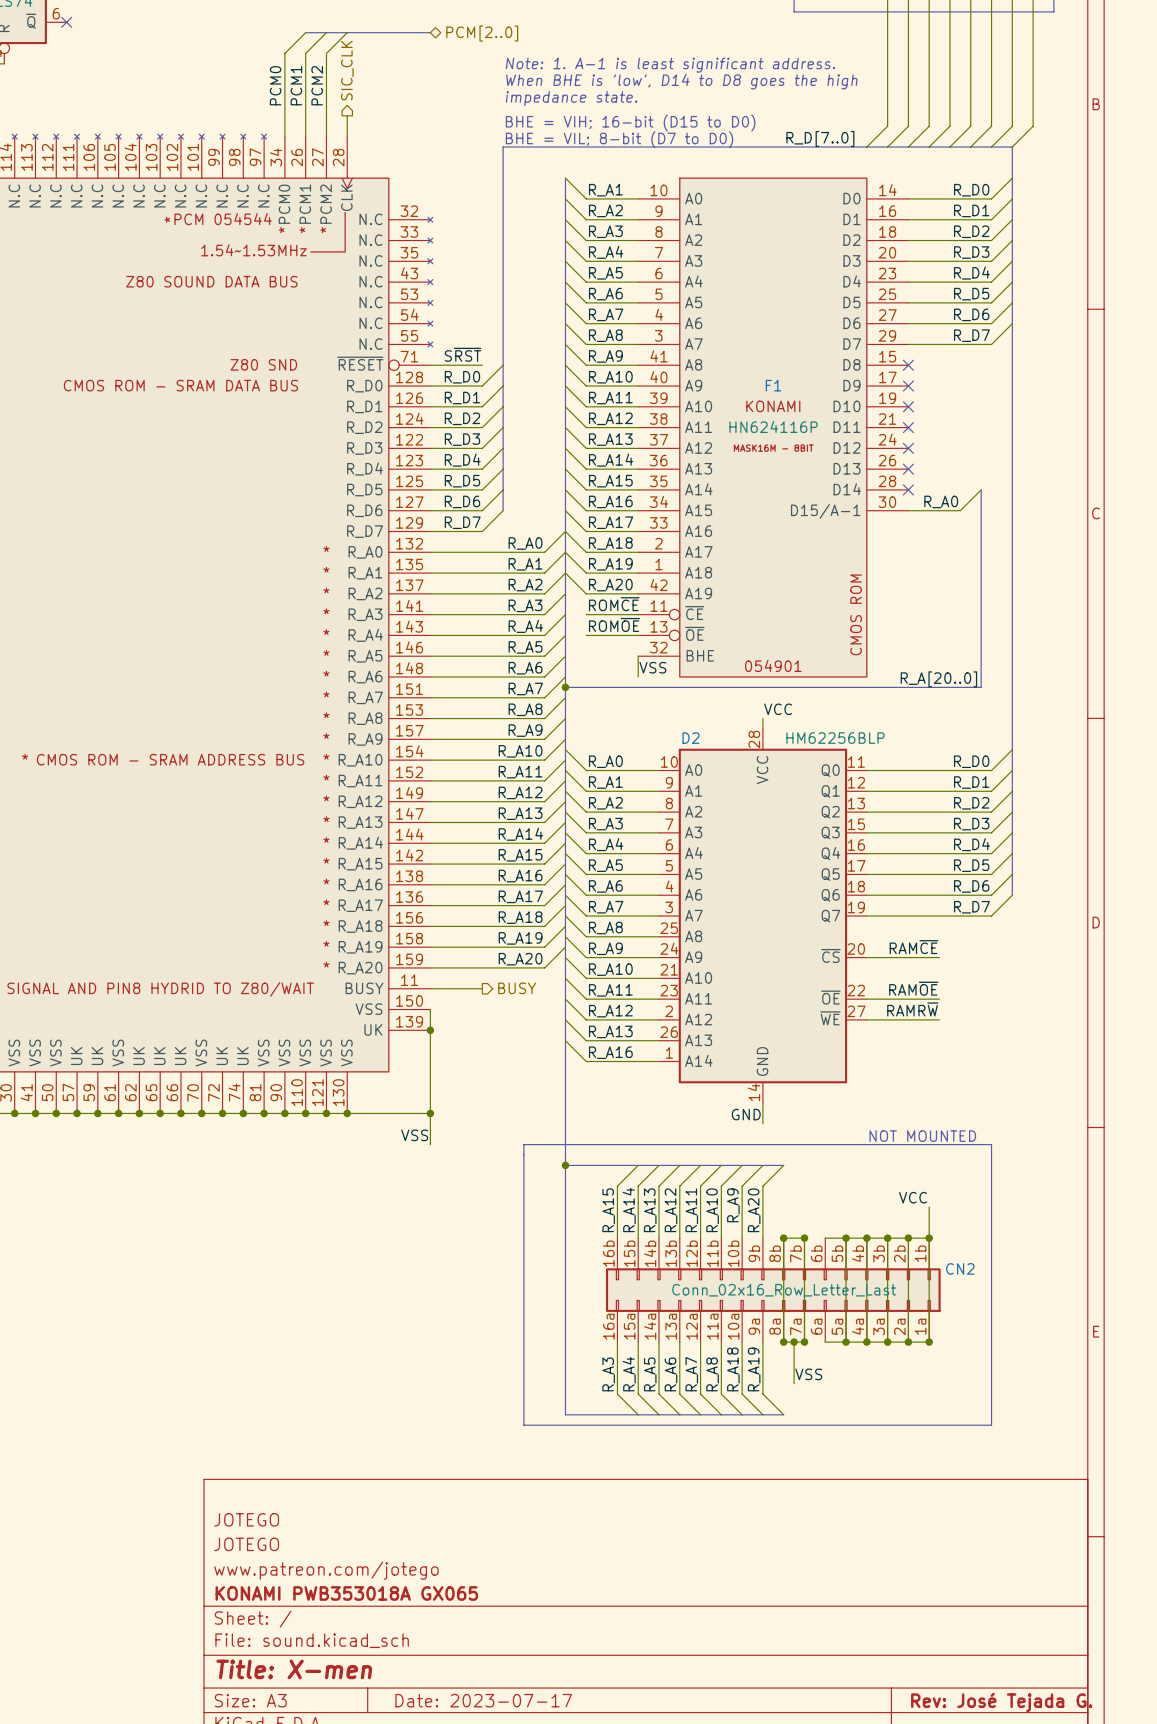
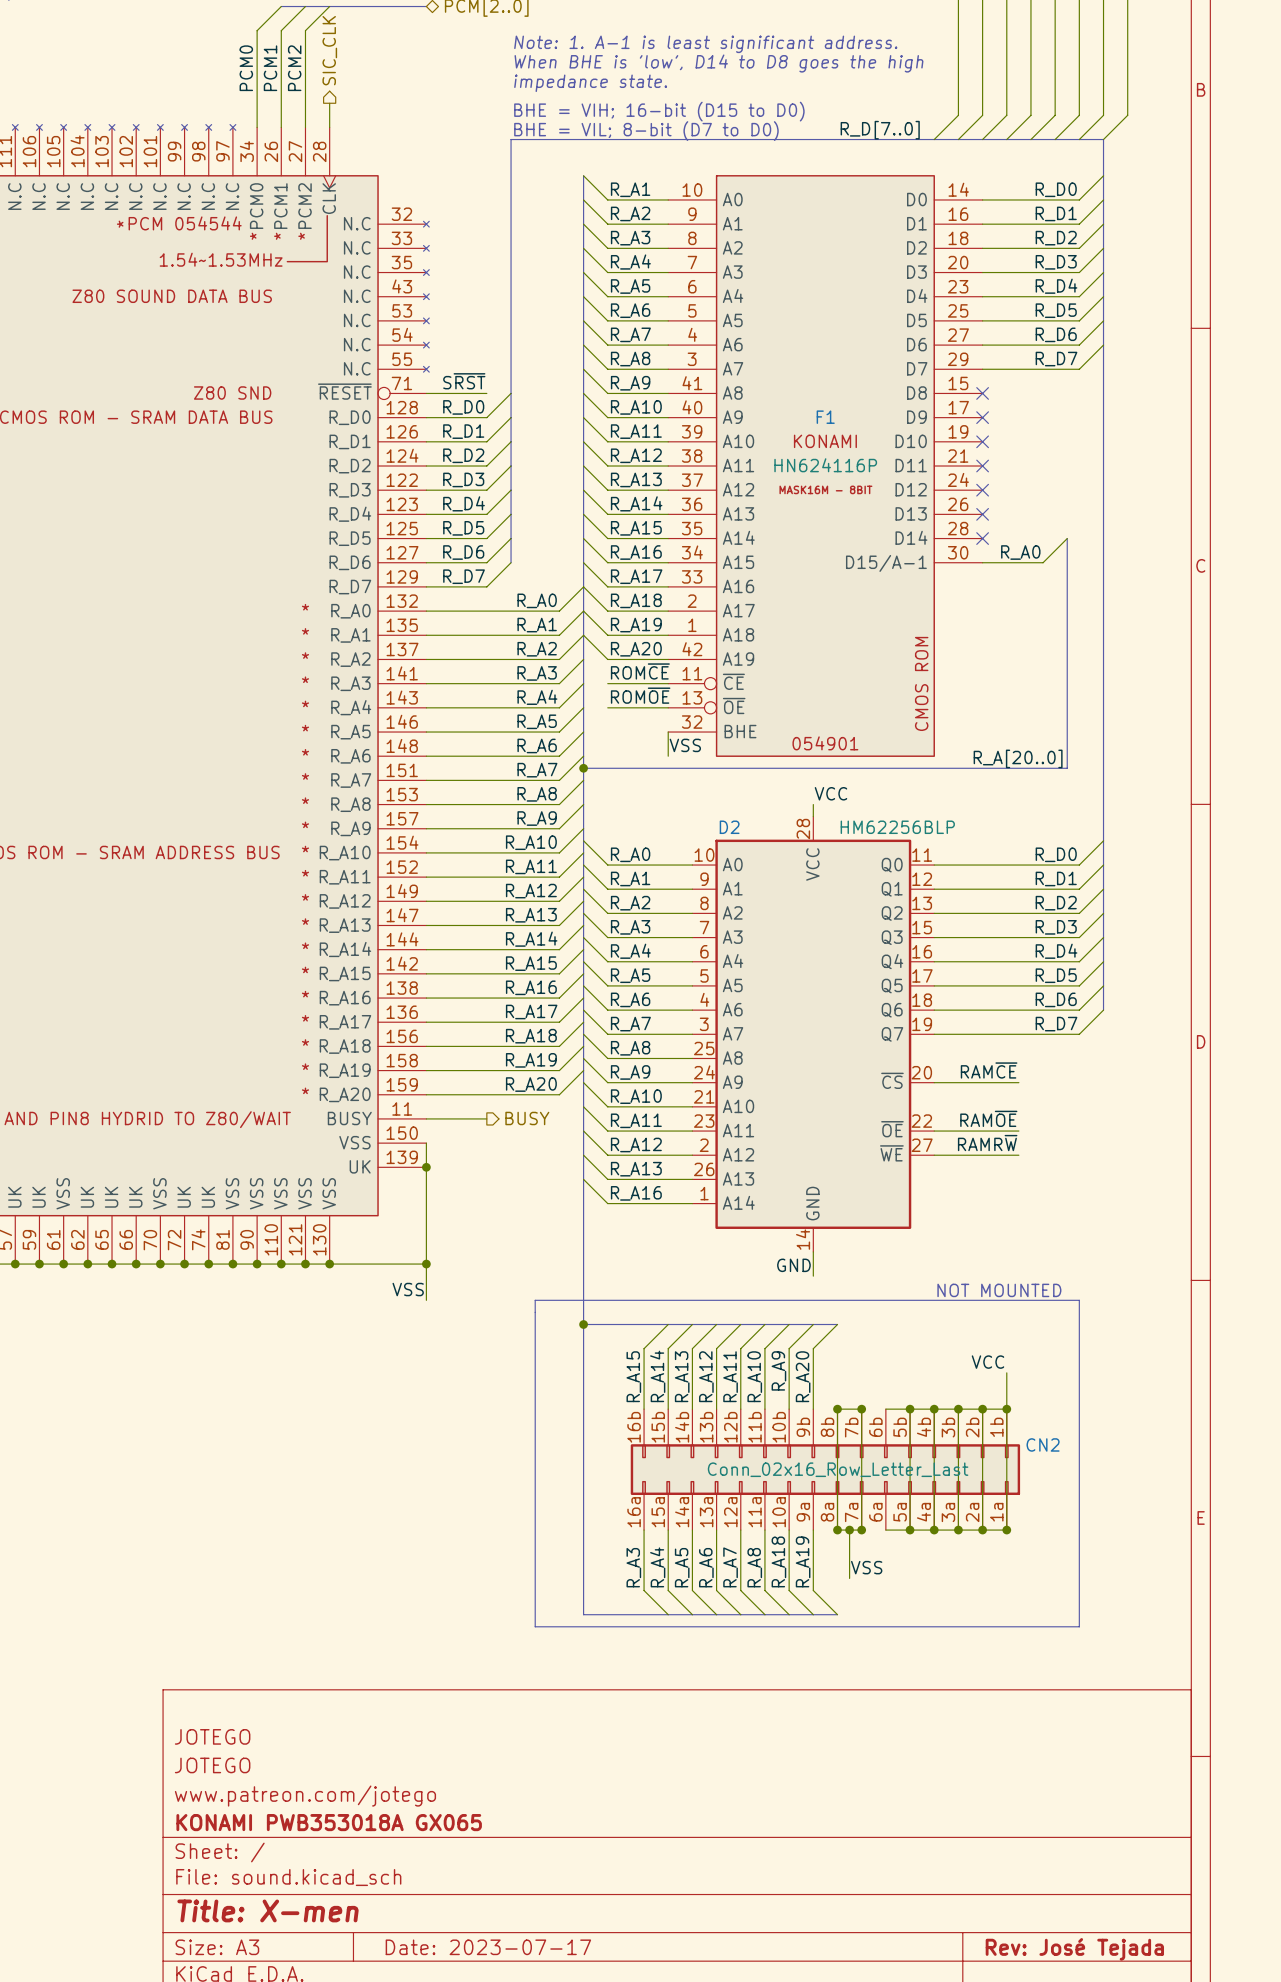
title block: Rev: José Tejada G. (1001, 1702) -> Rev: José Tejada (1074, 1949)

